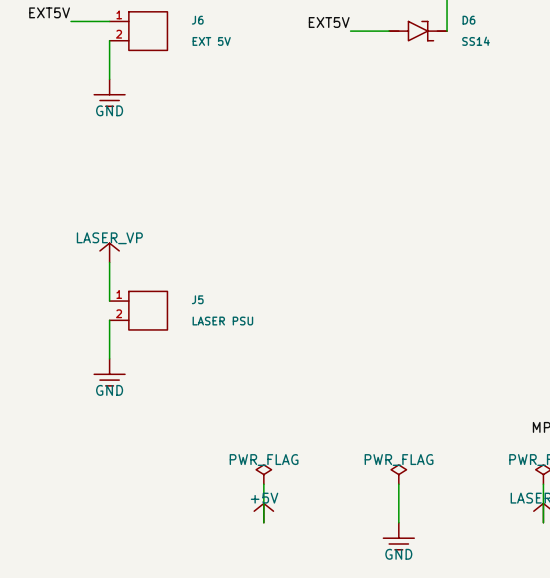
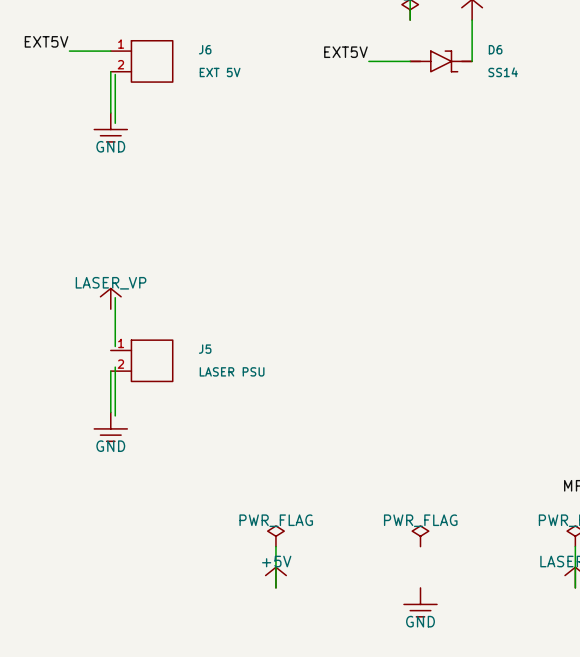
wire: none -> (115, 74) (115, 123)
wire: none -> (115, 297) (115, 346)
wire: (109, 262) (109, 301) -> none
wire: none -> (115, 367) (115, 415)
wire: (398, 484) (398, 522) -> none

